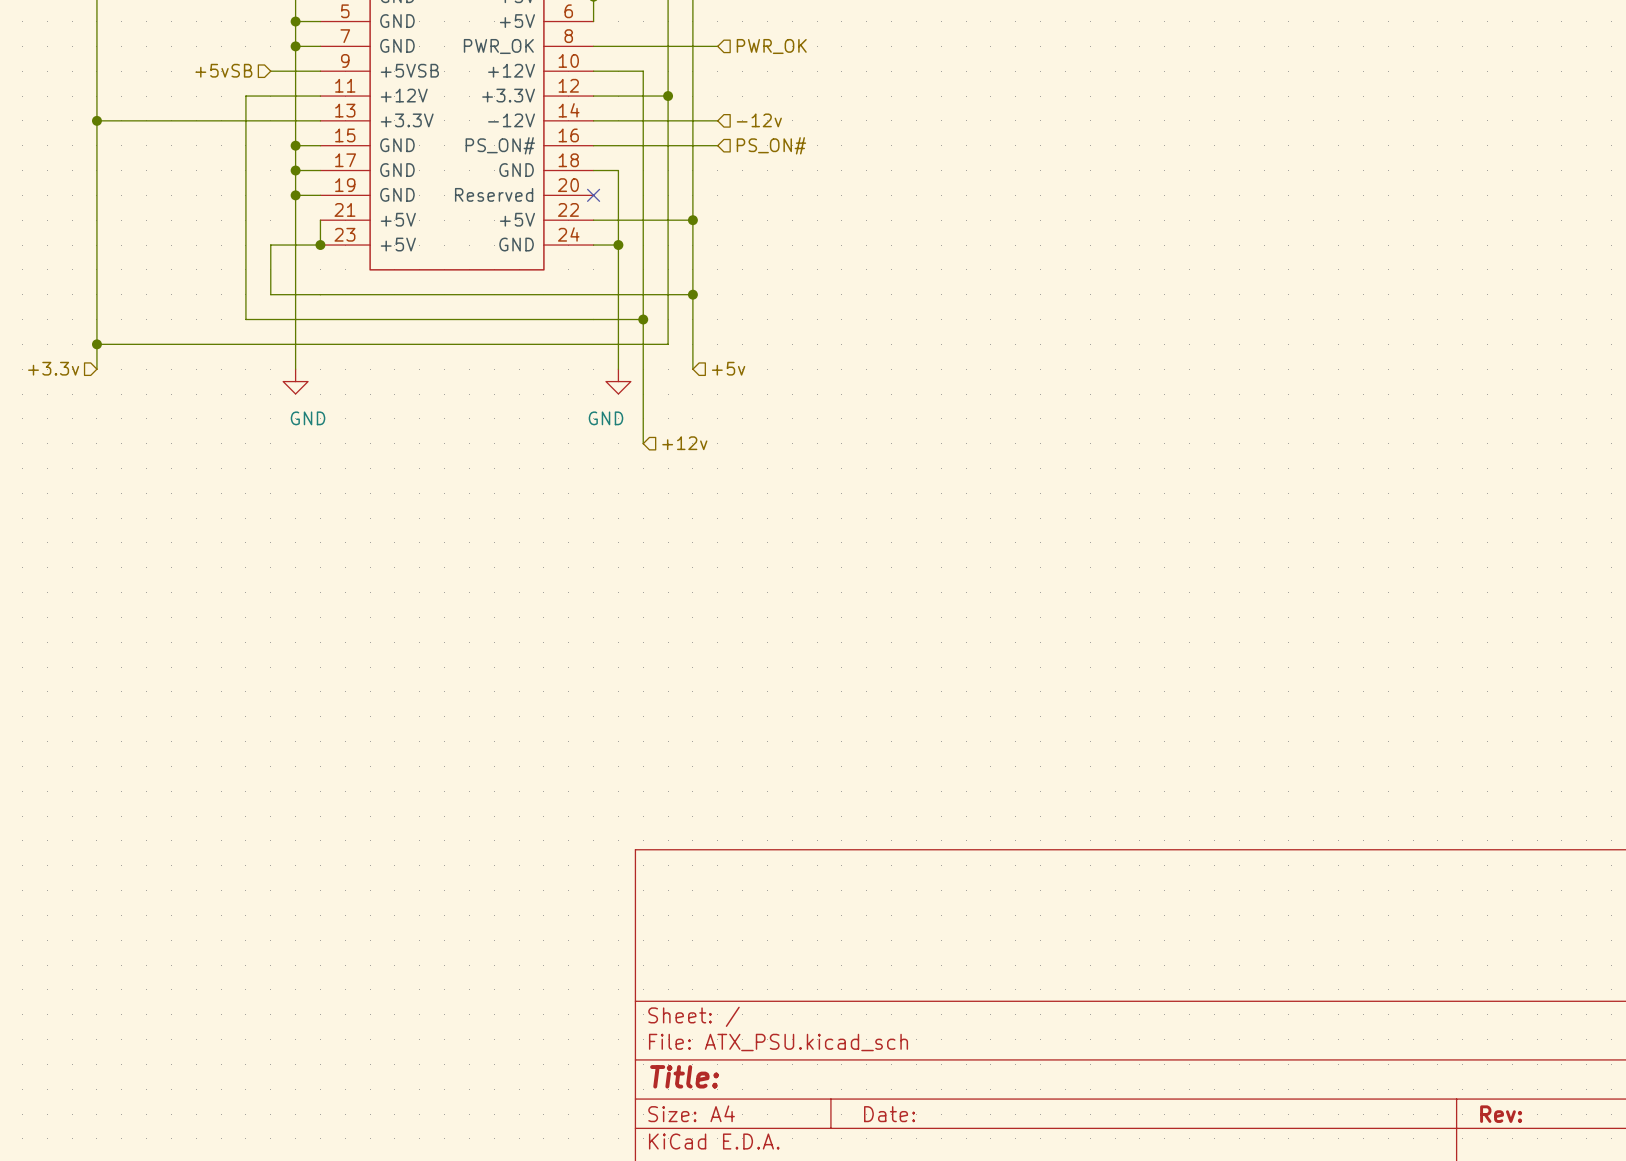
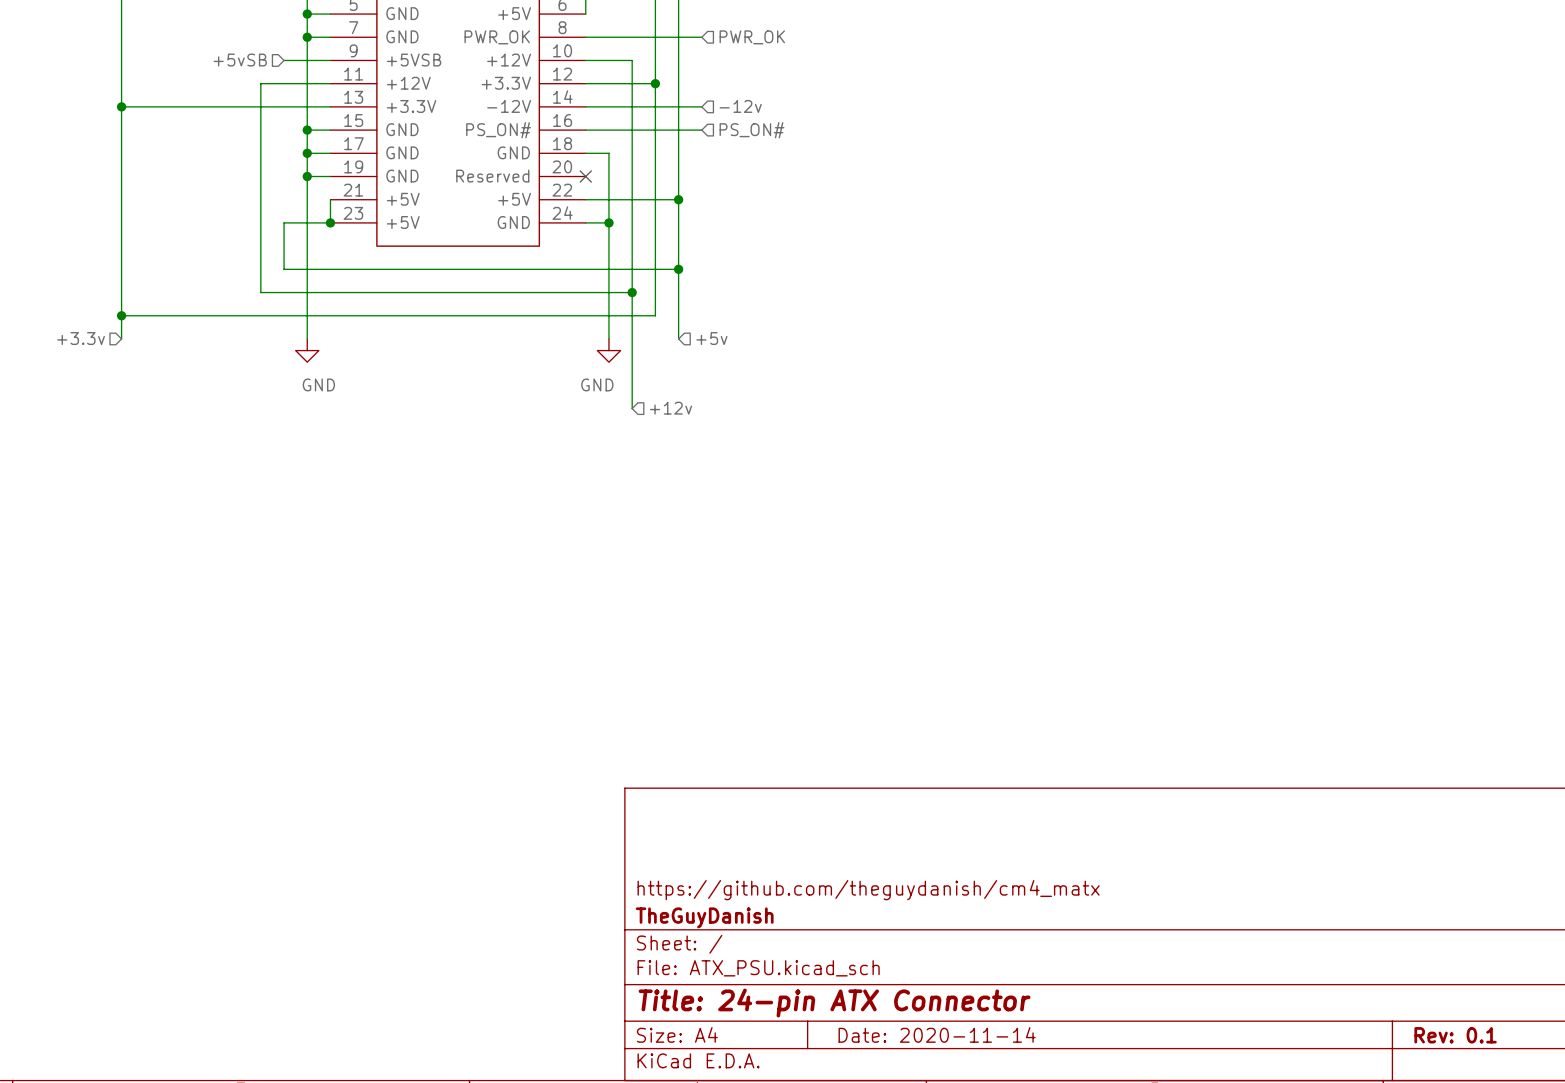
title block: none -> https://github.com/theguydanish/cm4_matx (868, 890)
title block: none -> TheGuyDanish (704, 917)
title block: Title: (684, 1076) -> Title: 24-pin ATX Connector (834, 1003)
title block: Date: (889, 1114) -> Date: 2020-11-14 (937, 1034)
title block: Rev: (1501, 1114) -> Rev: 0.1 (1455, 1035)

